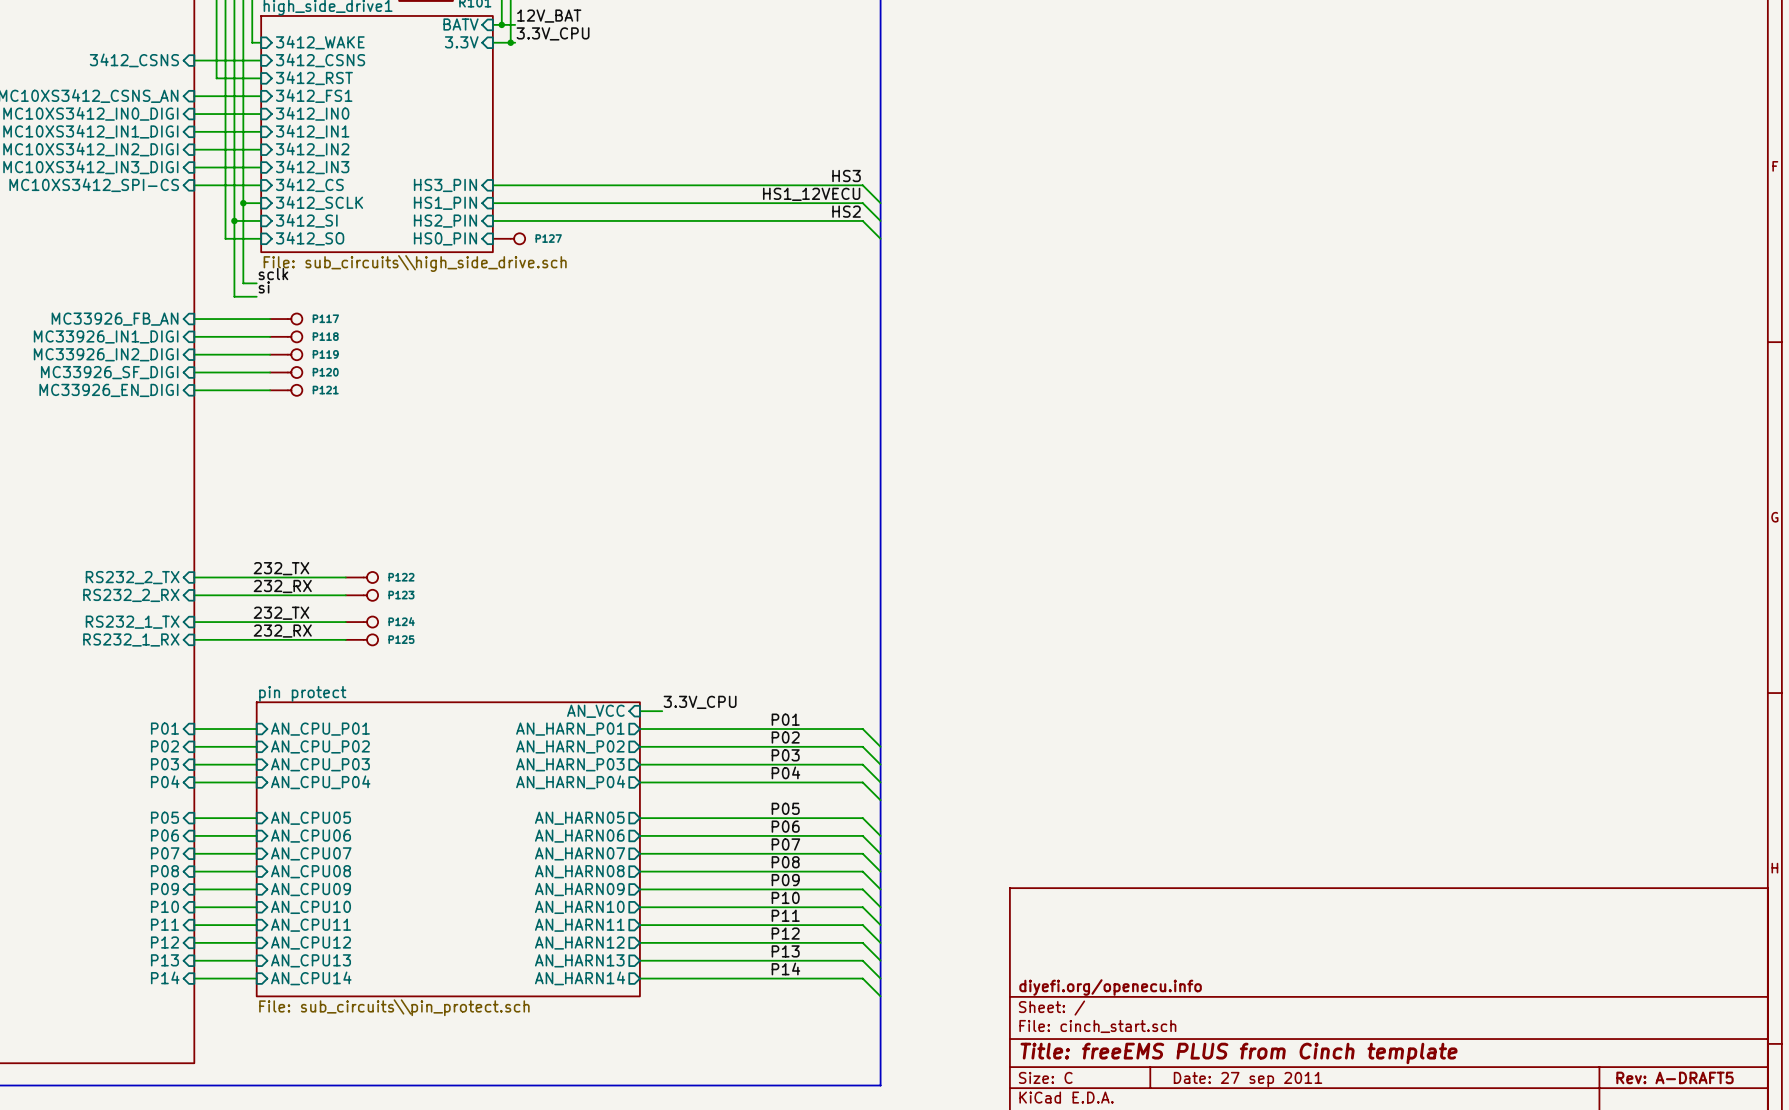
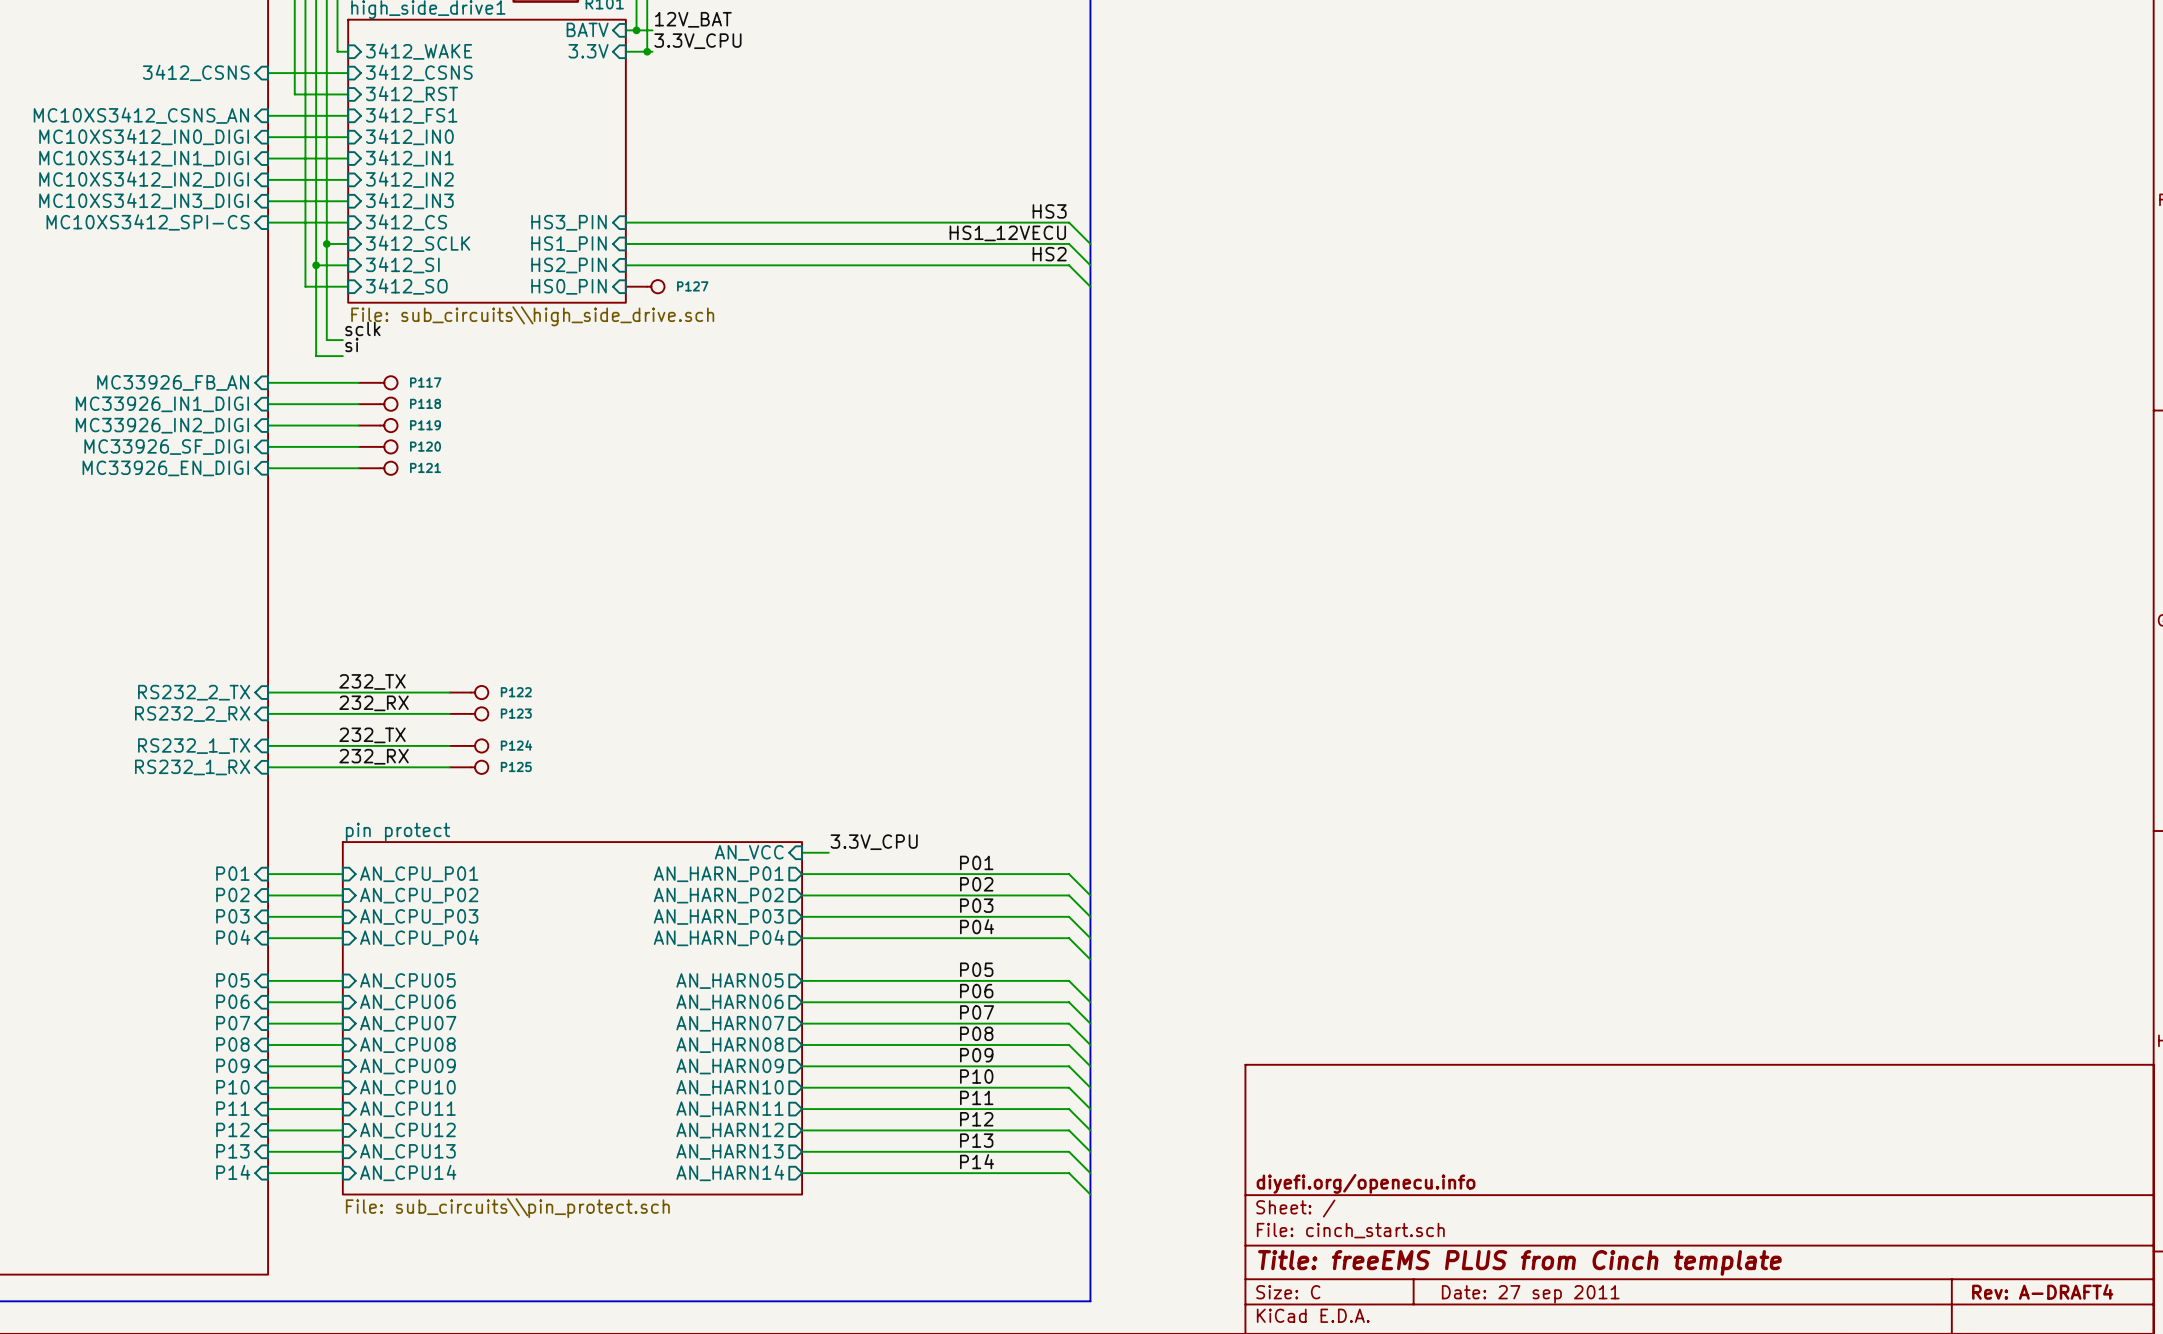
title block: Rev: A-DRAFT5 (1675, 1077) -> Rev: A-DRAFT4 (2042, 1291)

